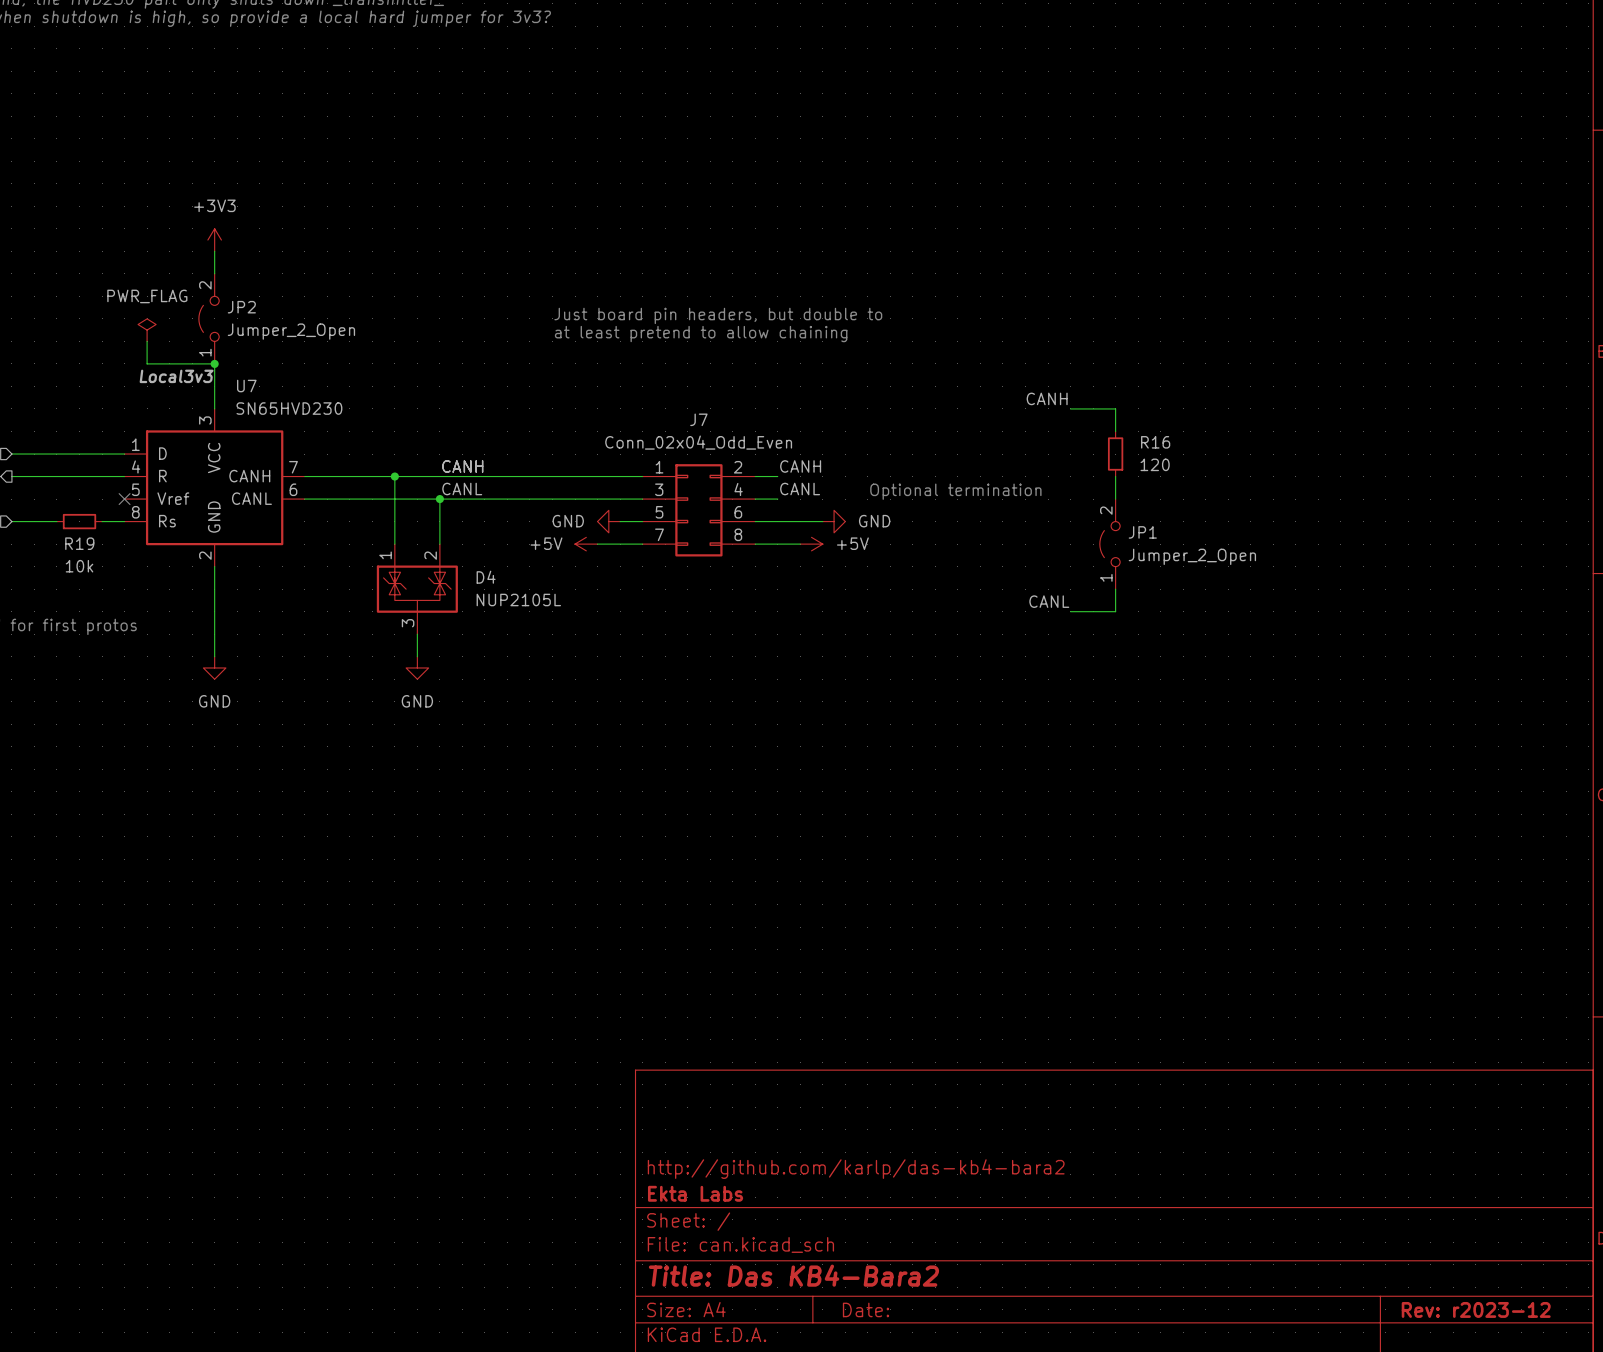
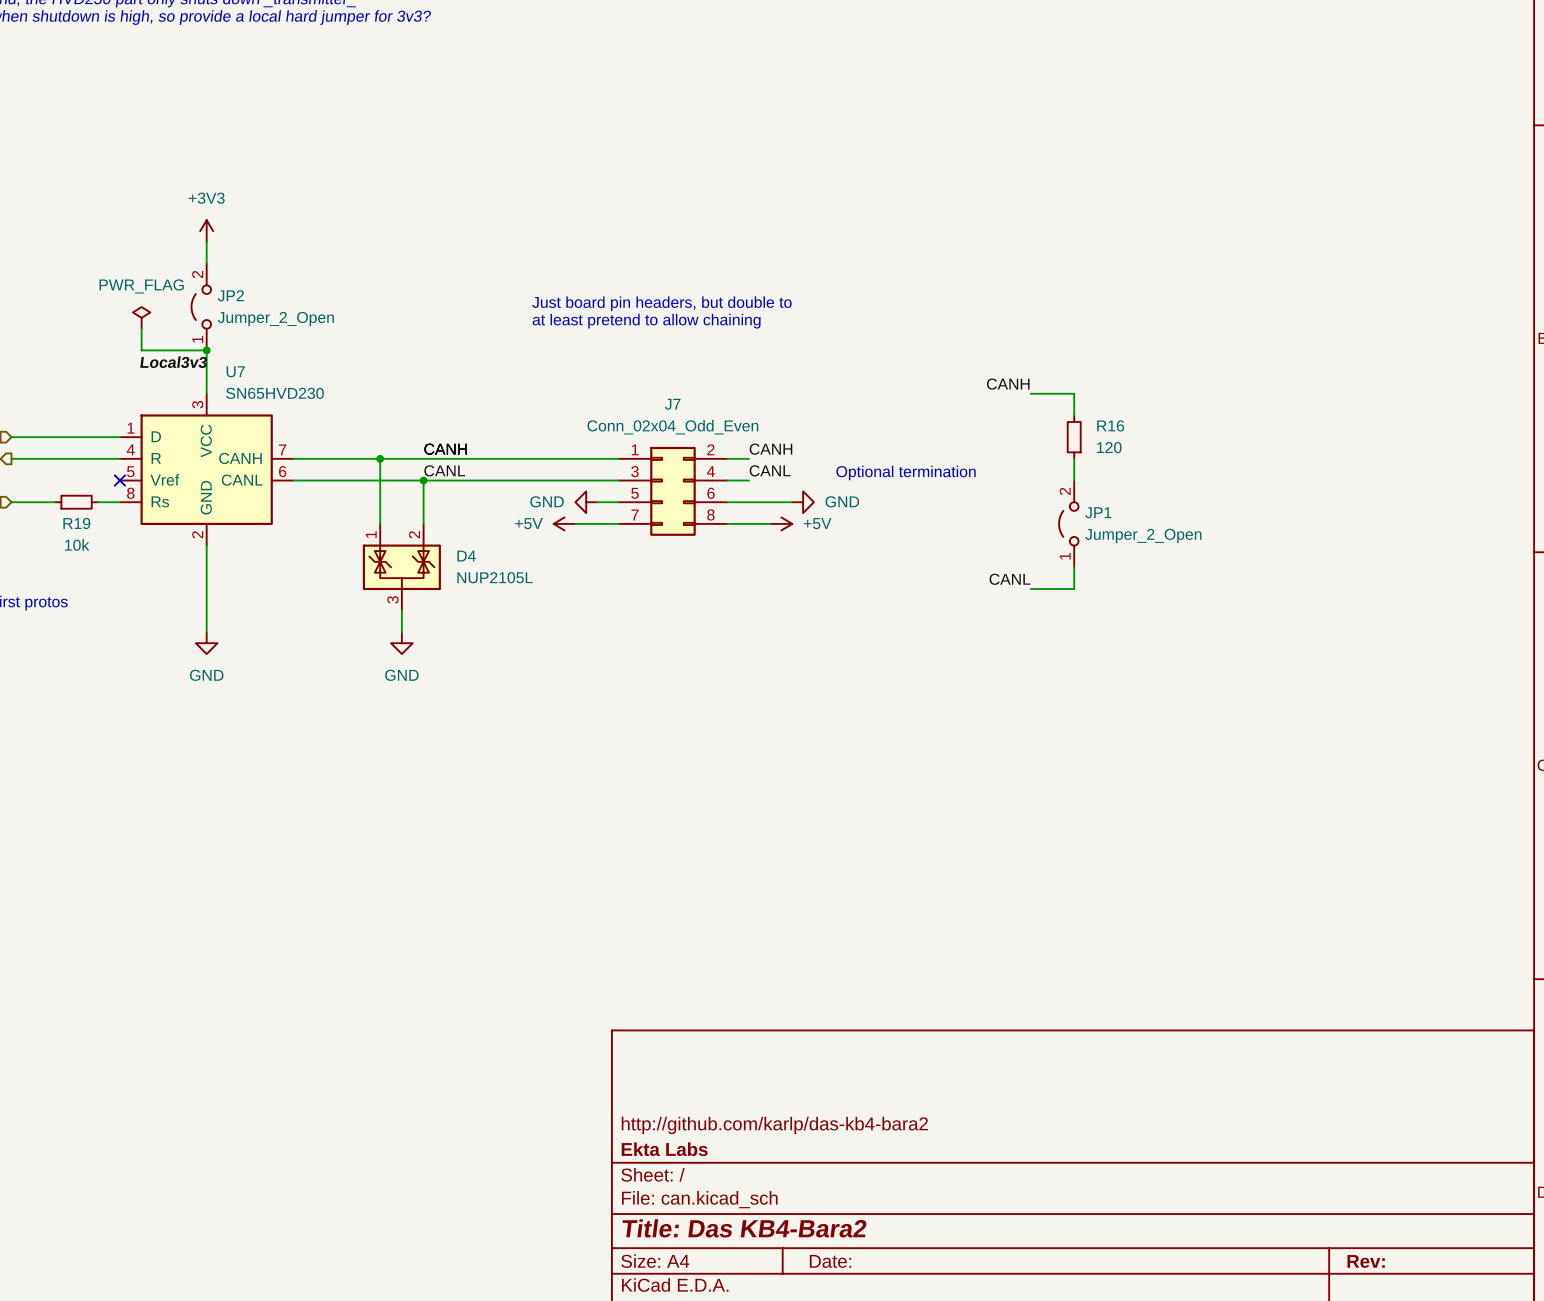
title block: Rev: r2023-12 (1476, 1309) -> Rev: (1366, 1261)

